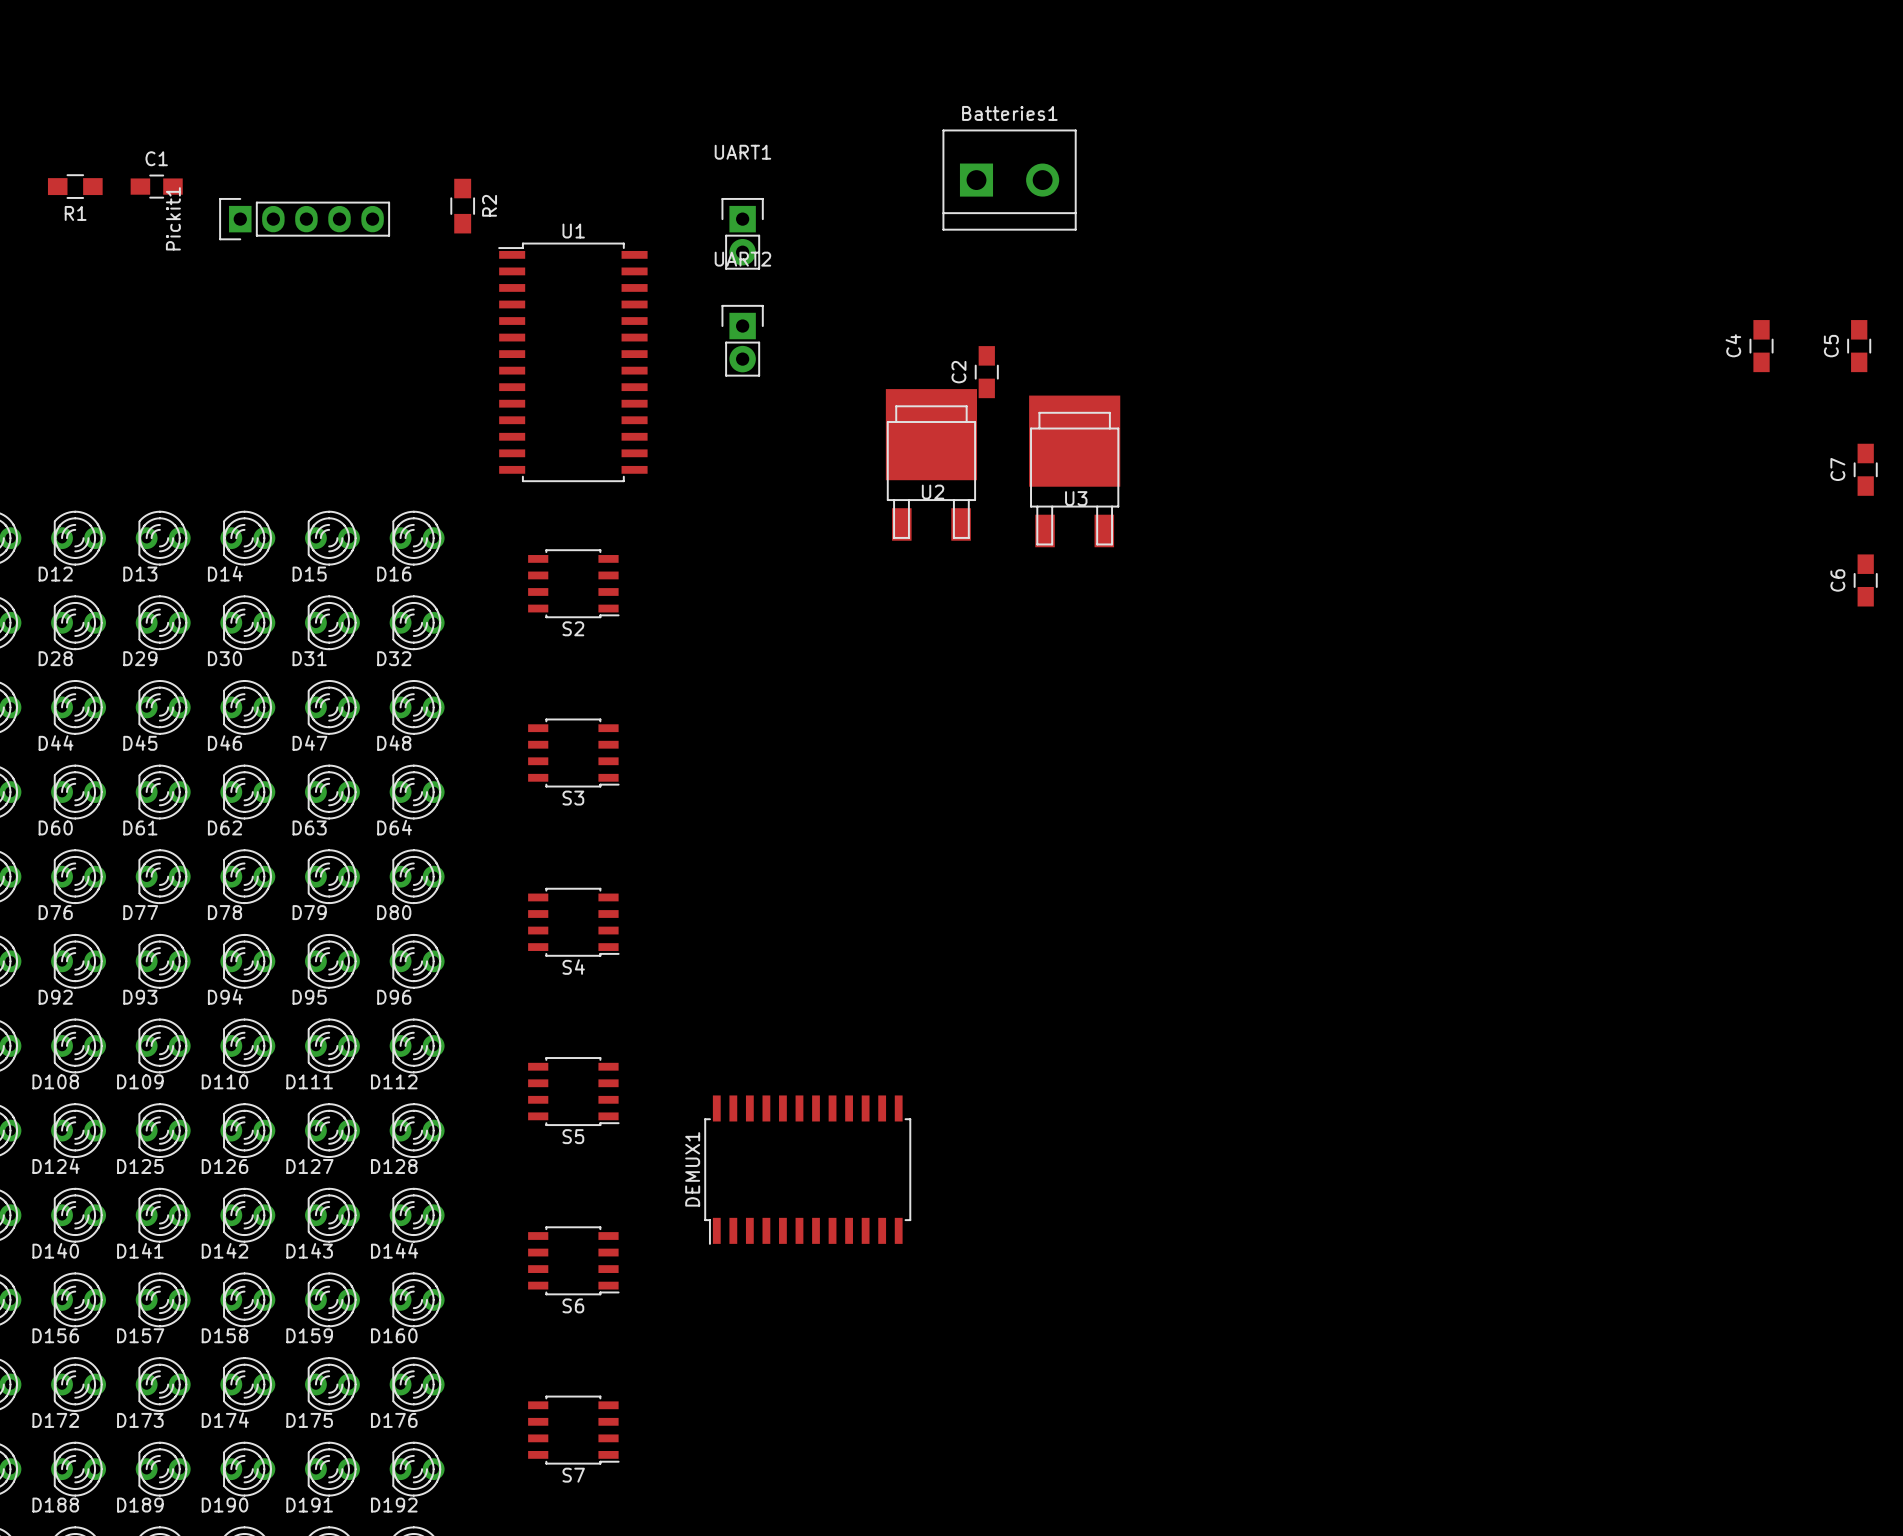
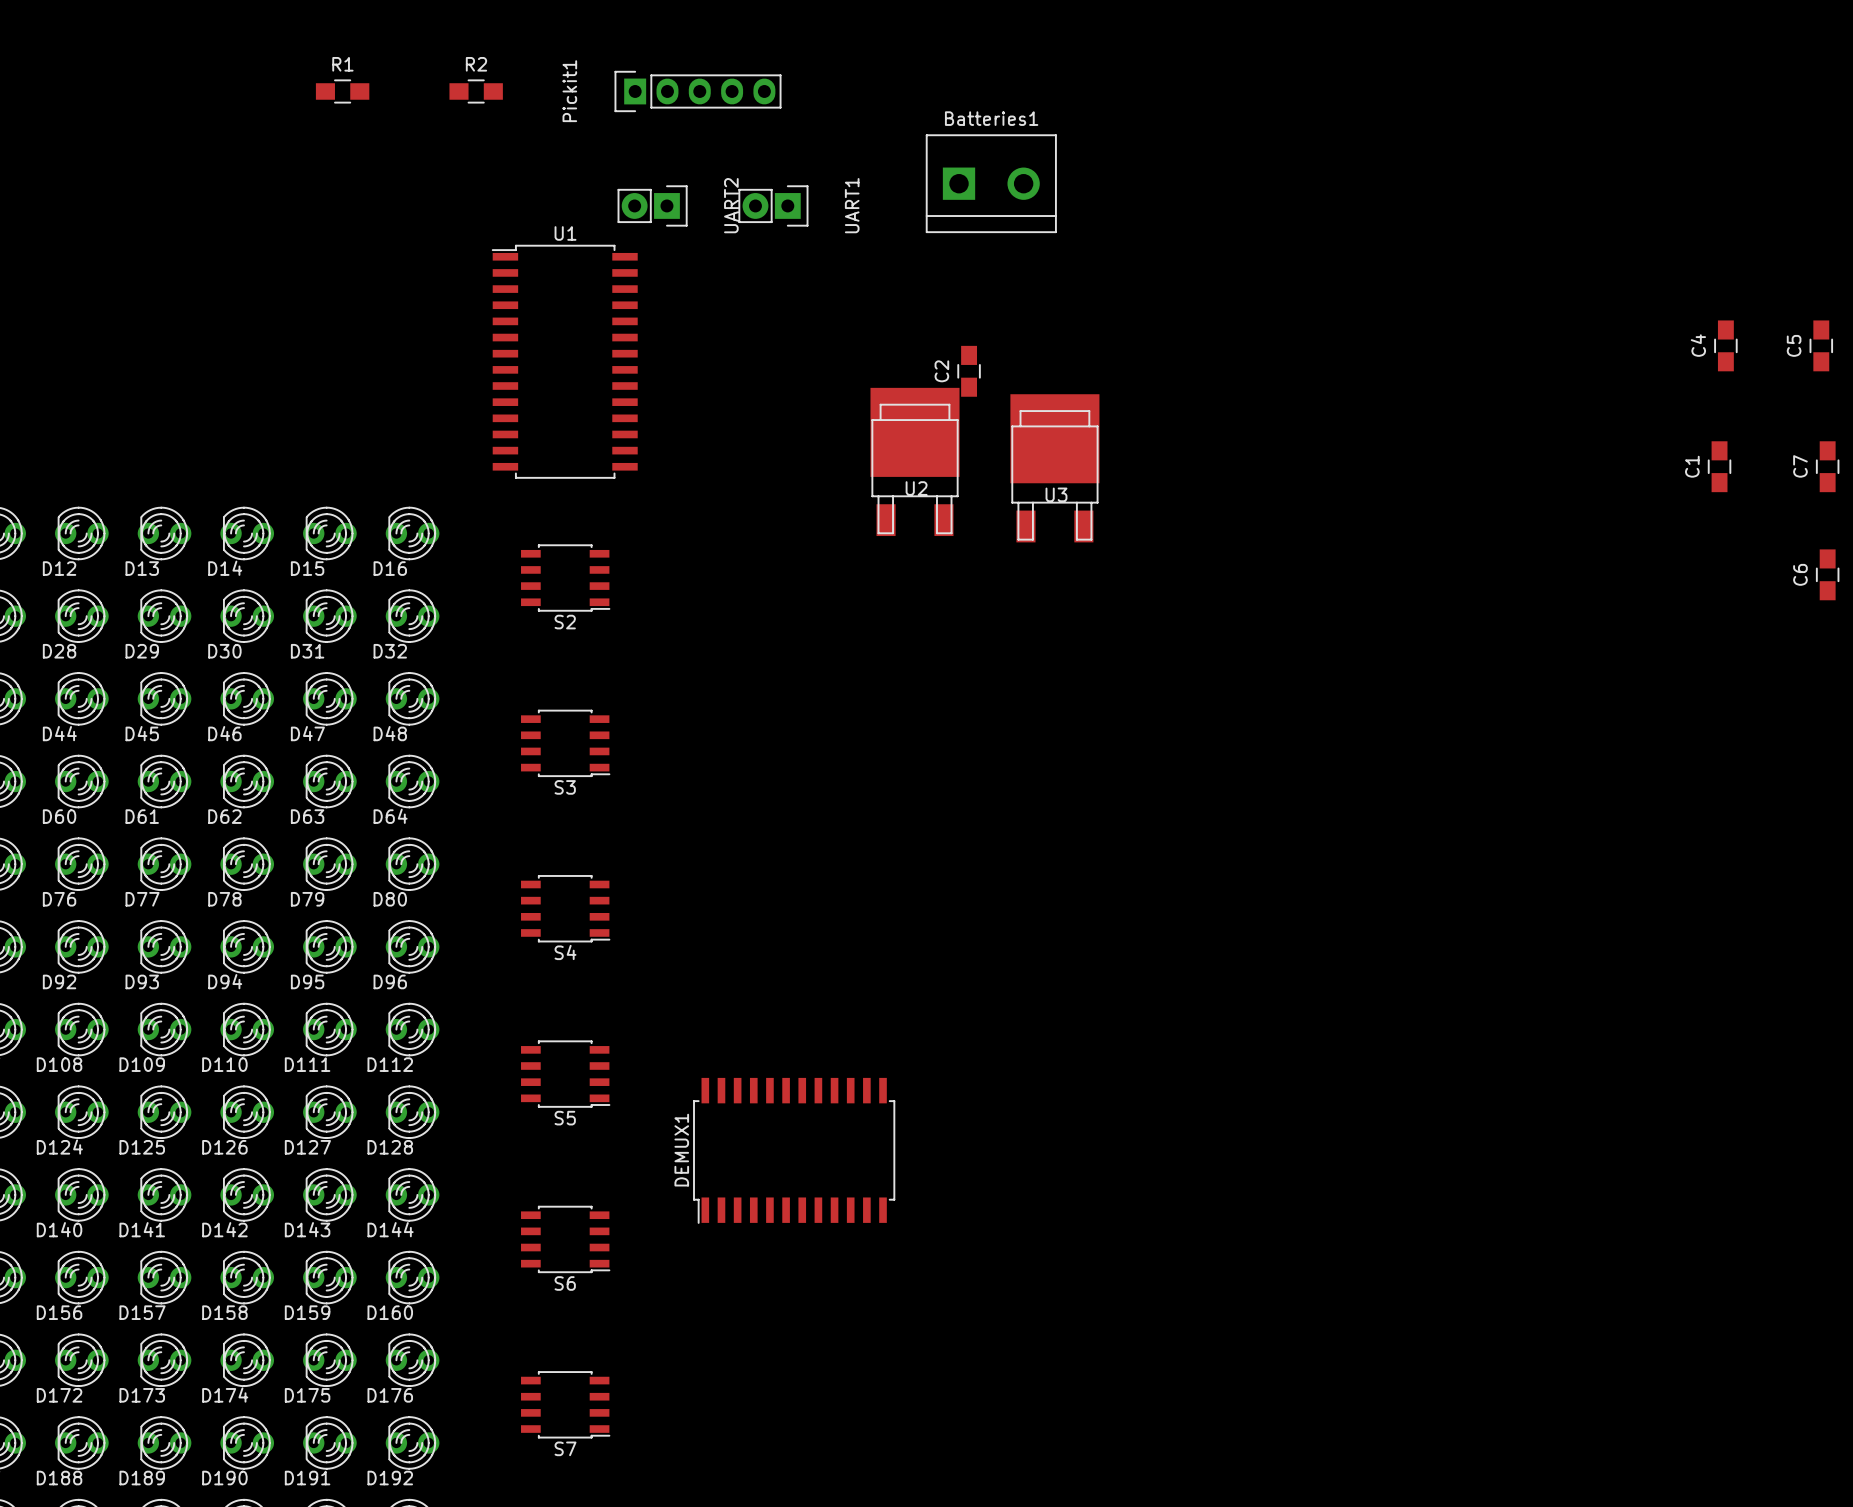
C1 name position: C1 (156, 158) -> C1 (1692, 466)
R1 position: (75, 186) -> (342, 91)
C1 rotation: 0° (156, 186) -> 90° clockwise (1719, 466)
C1 position: (156, 186) -> (1719, 466)
R2 name position: R2 (489, 205) -> R2 (476, 64)
R2 rotation: 0° (462, 206) -> 90° clockwise (476, 91)
R2 position: (462, 206) -> (476, 91)
R1 name position: R1 (75, 213) -> R1 (342, 64)
Pickit1 position: (304, 219) -> (698, 91)
UART1 rotation: 0° (742, 233) -> 90° clockwise (773, 205)
UART1 position: (742, 233) -> (773, 205)
UART2 rotation: 0° (742, 340) -> 90° clockwise (652, 205)
UART2 position: (742, 340) -> (652, 205)

